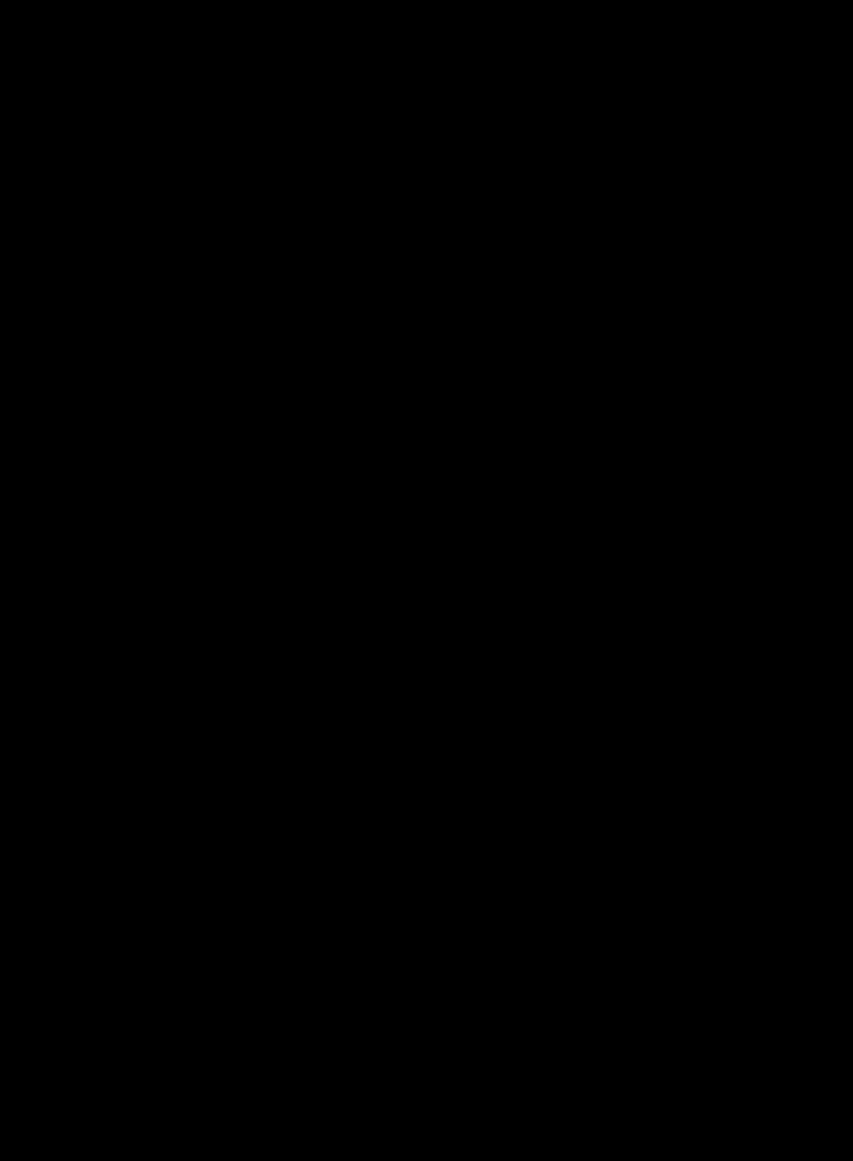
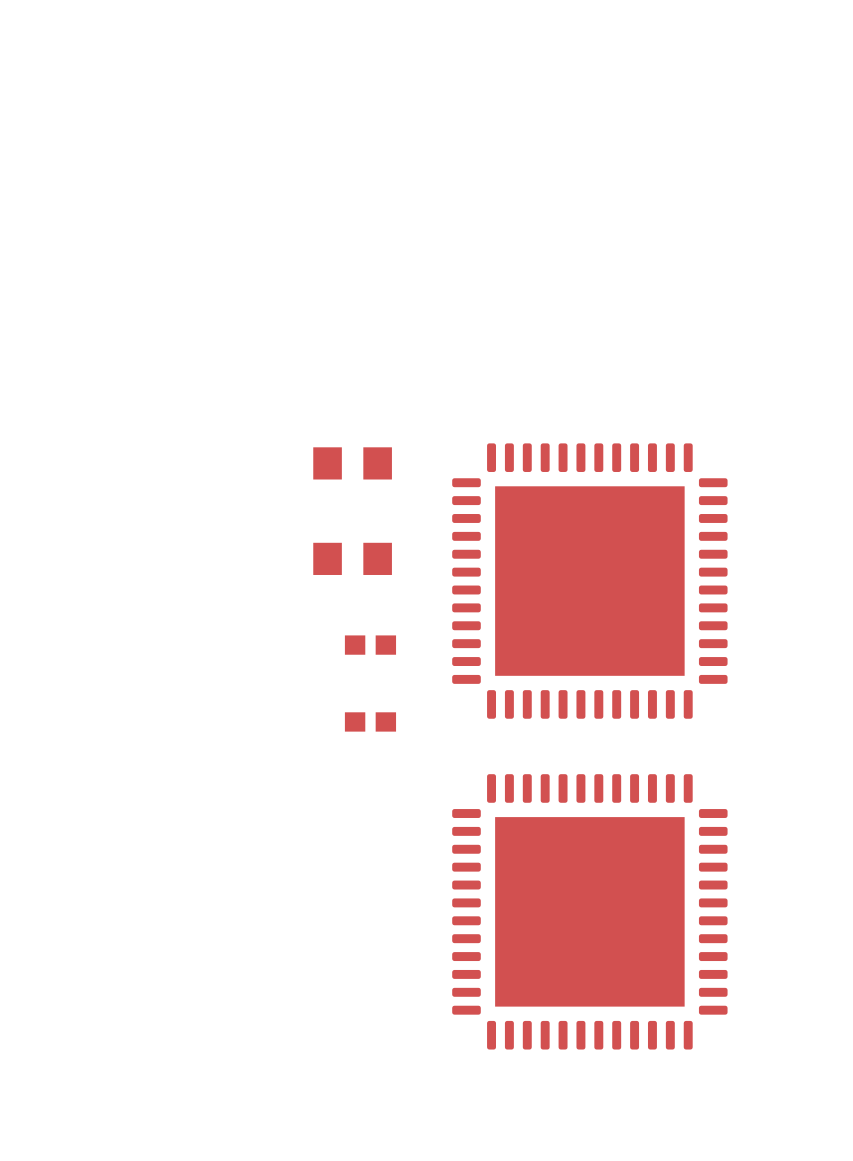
part: none -> (352, 463)
part: none -> (352, 558)
part: none -> (589, 581)
part: none -> (370, 645)
part: none -> (370, 721)
part: none -> (589, 911)

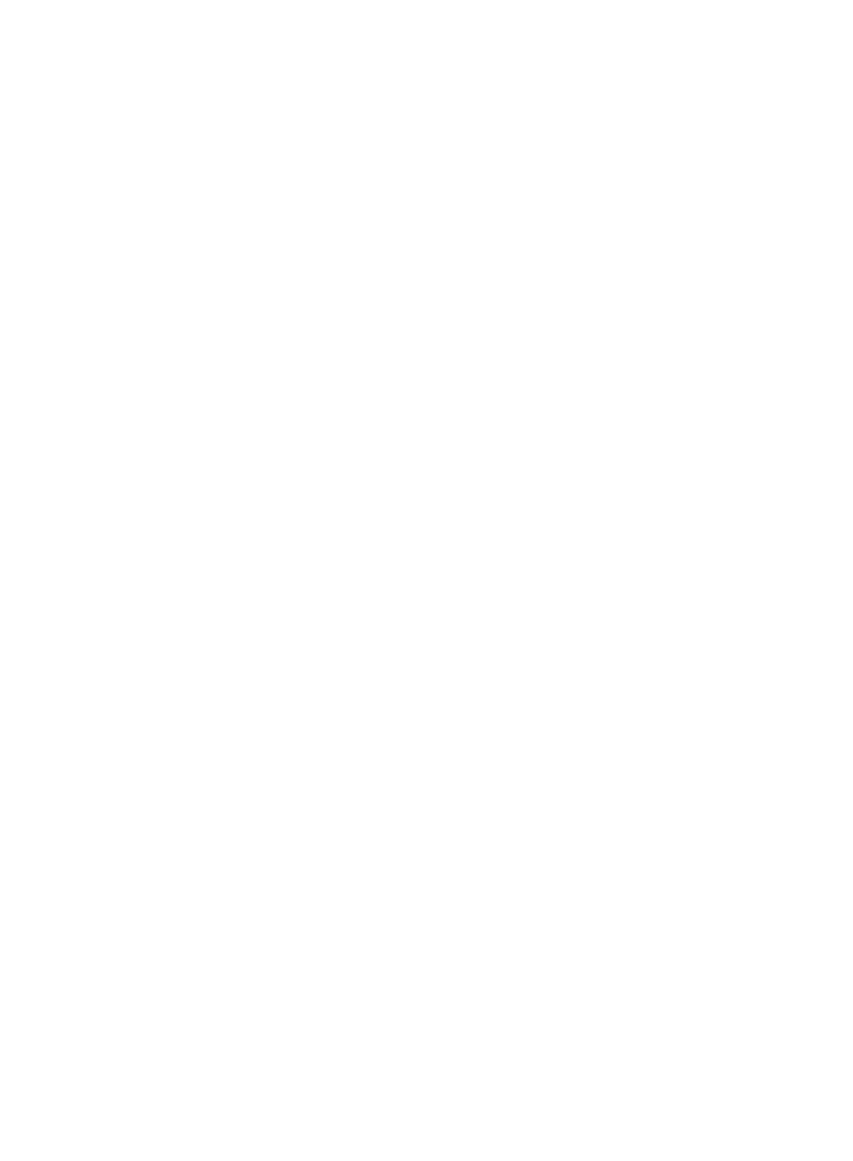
part: (352, 463) -> none
part: (352, 558) -> none
part: (589, 581) -> none
part: (370, 645) -> none
part: (370, 721) -> none
part: (589, 911) -> none

